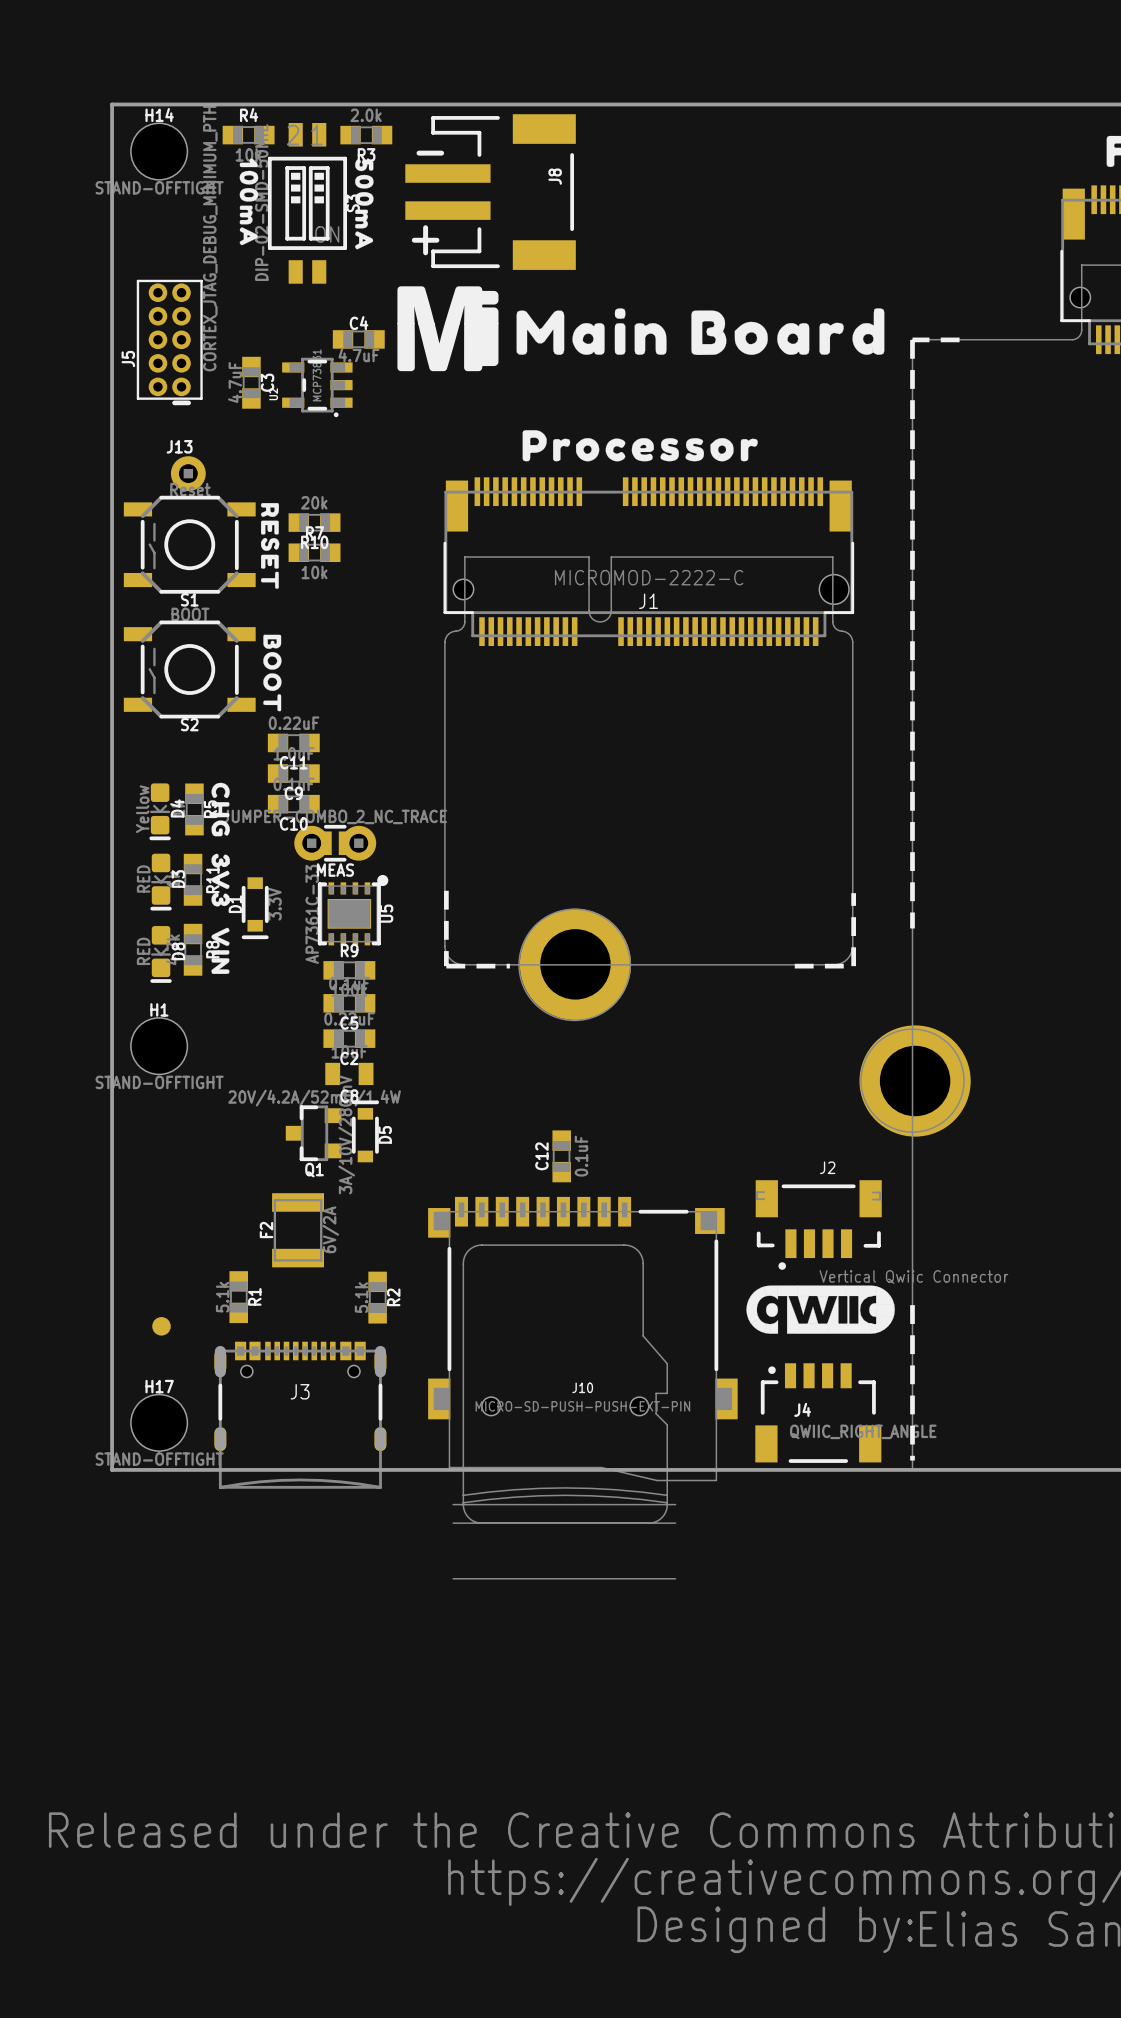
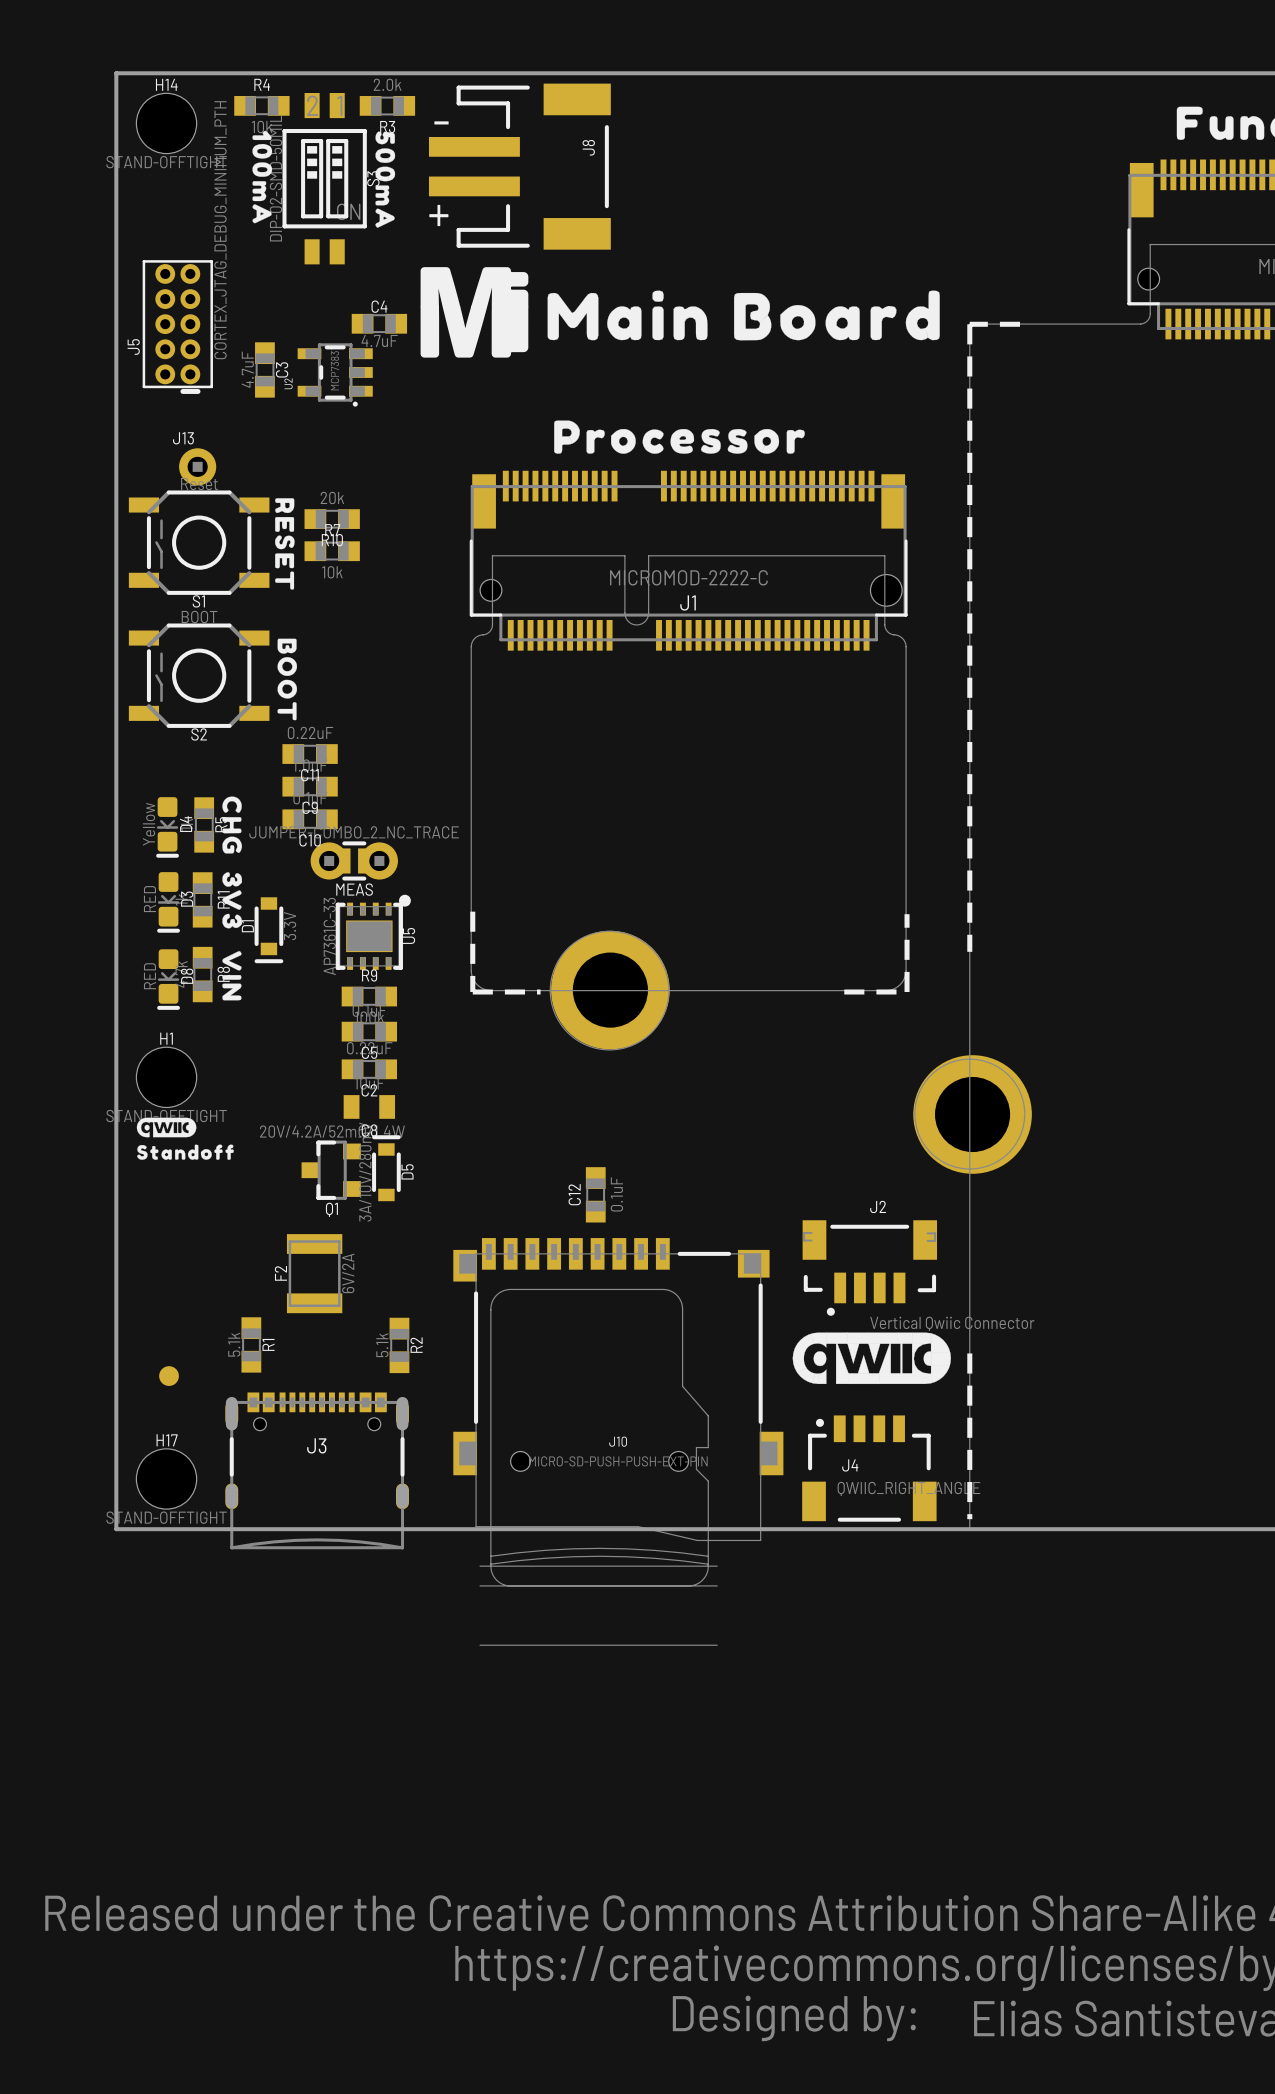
drawing: none -> [136, 1117, 234, 1160]

